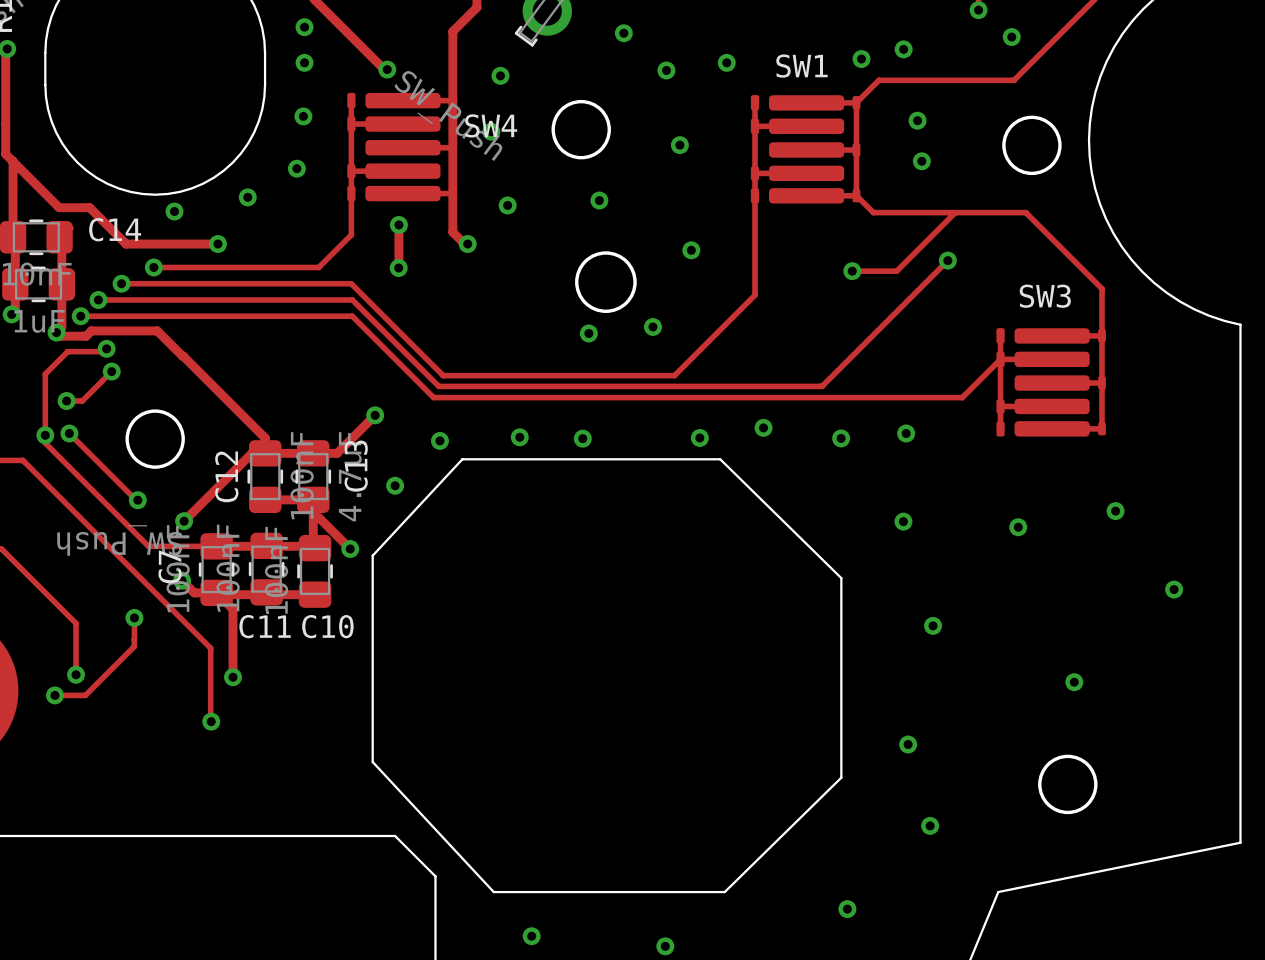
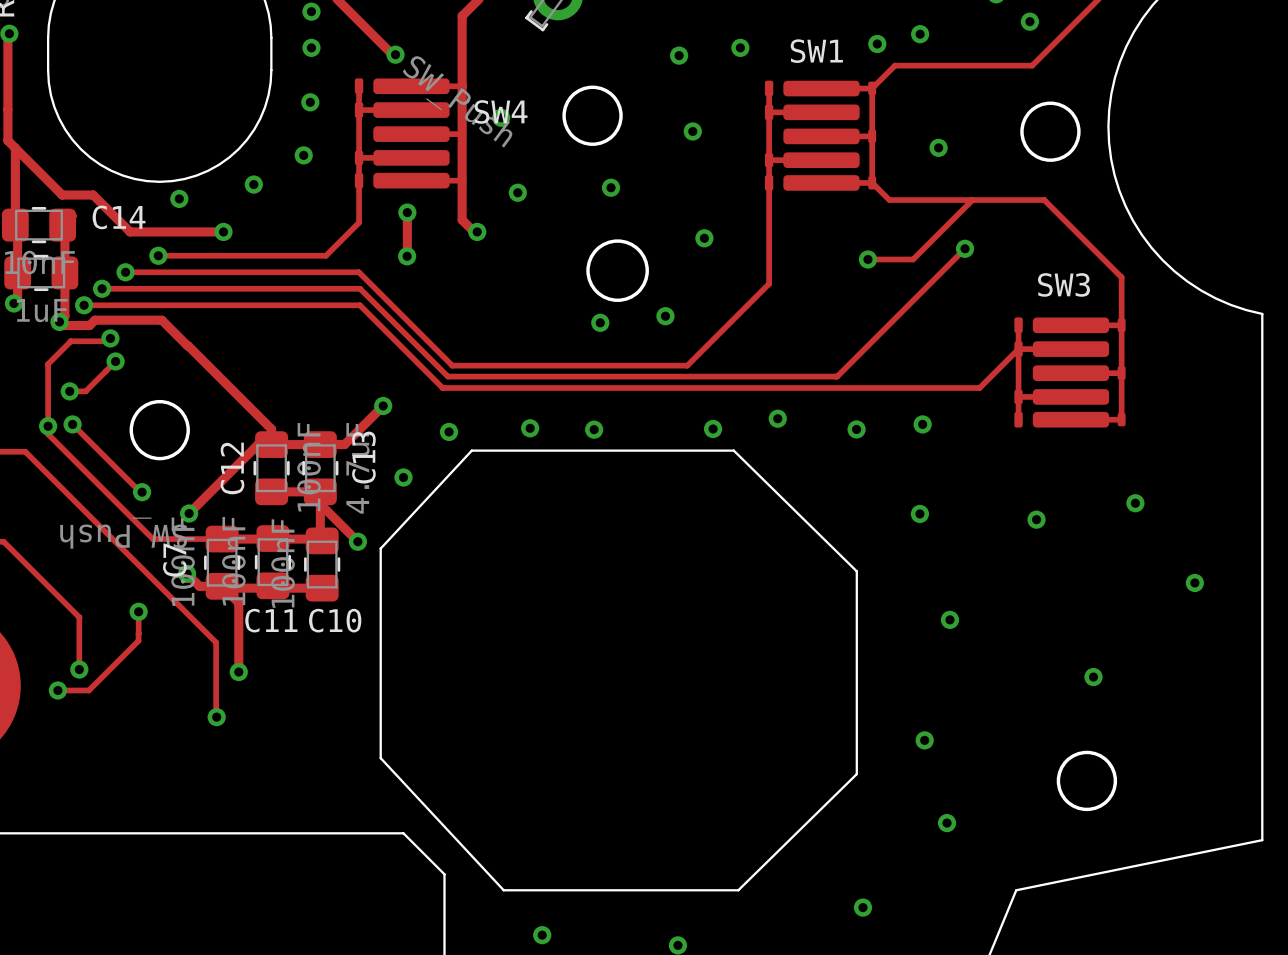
via: (623, 33) -> none
via: (500, 75) -> none
via: (917, 120) -> none

